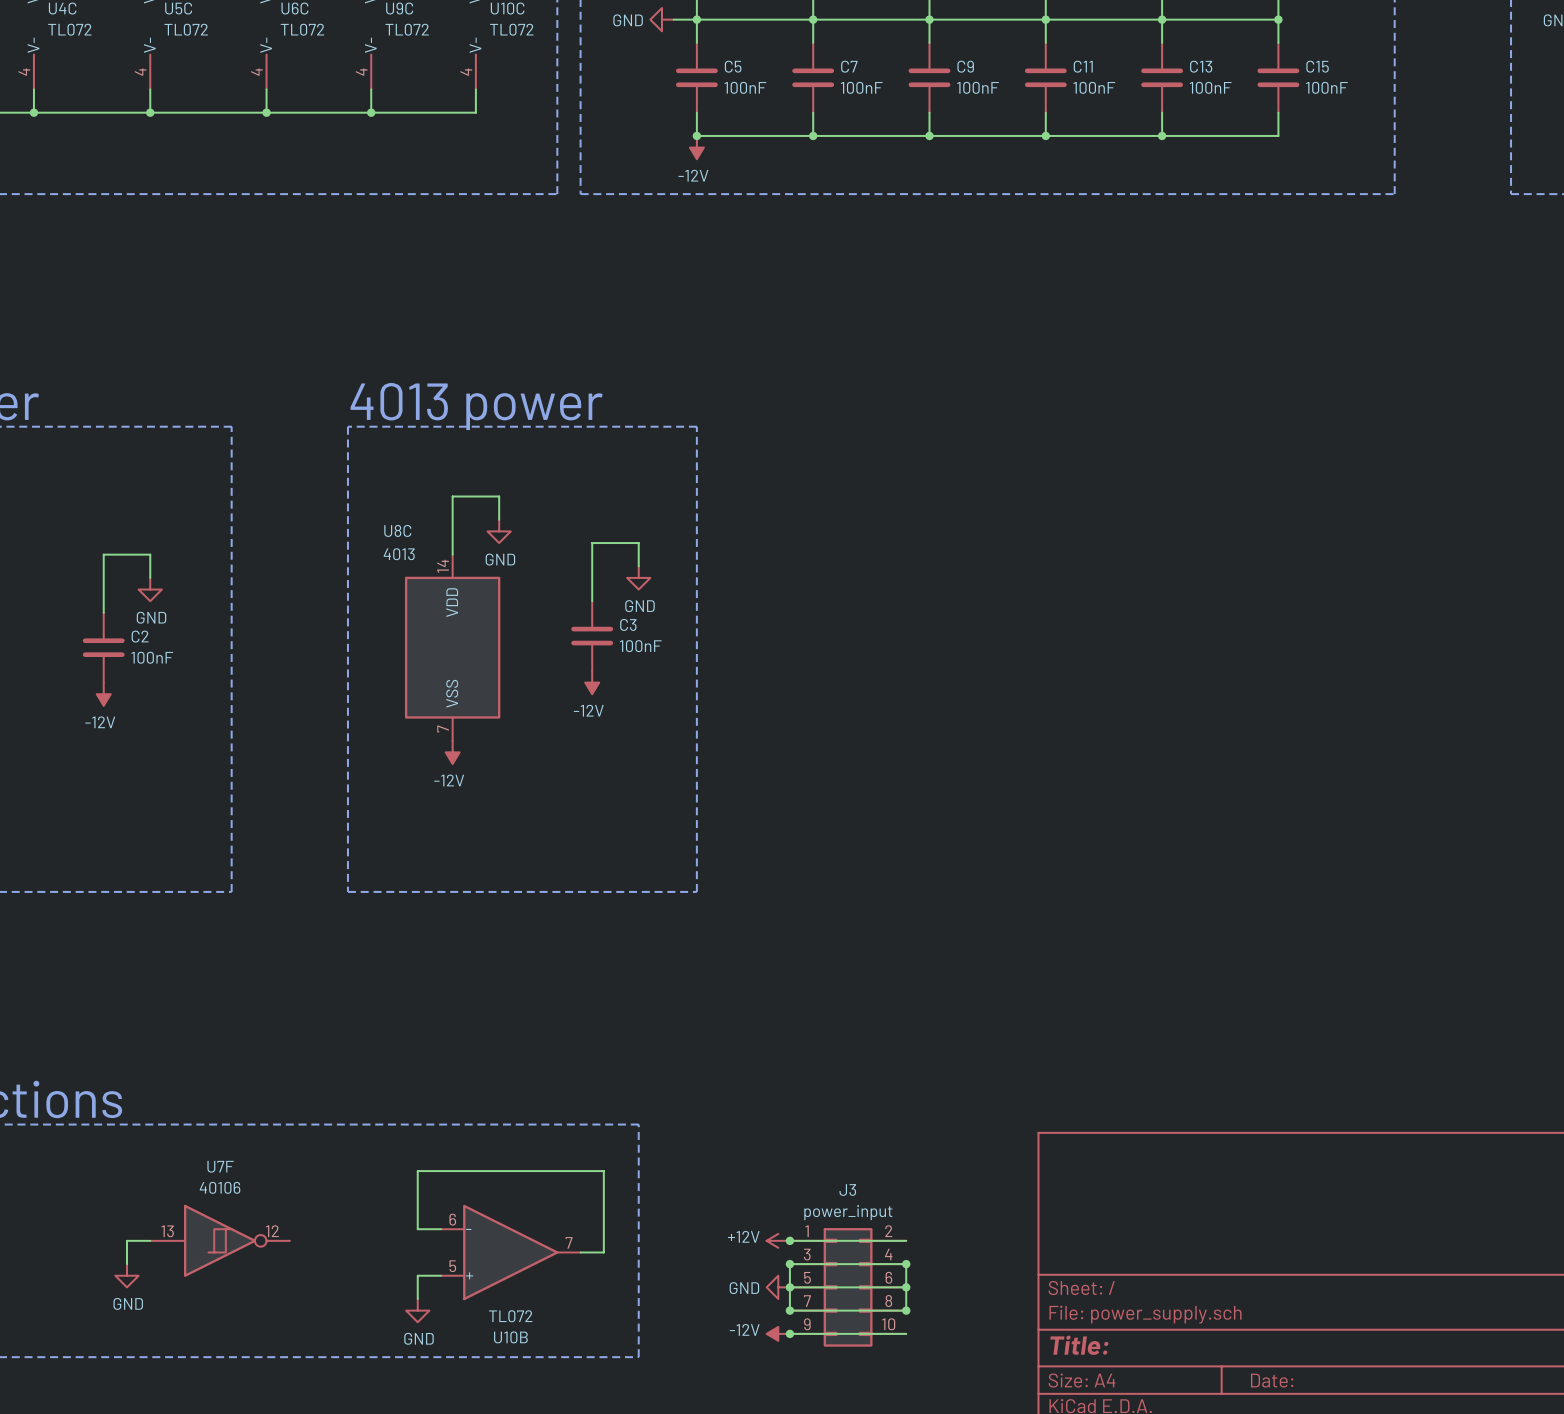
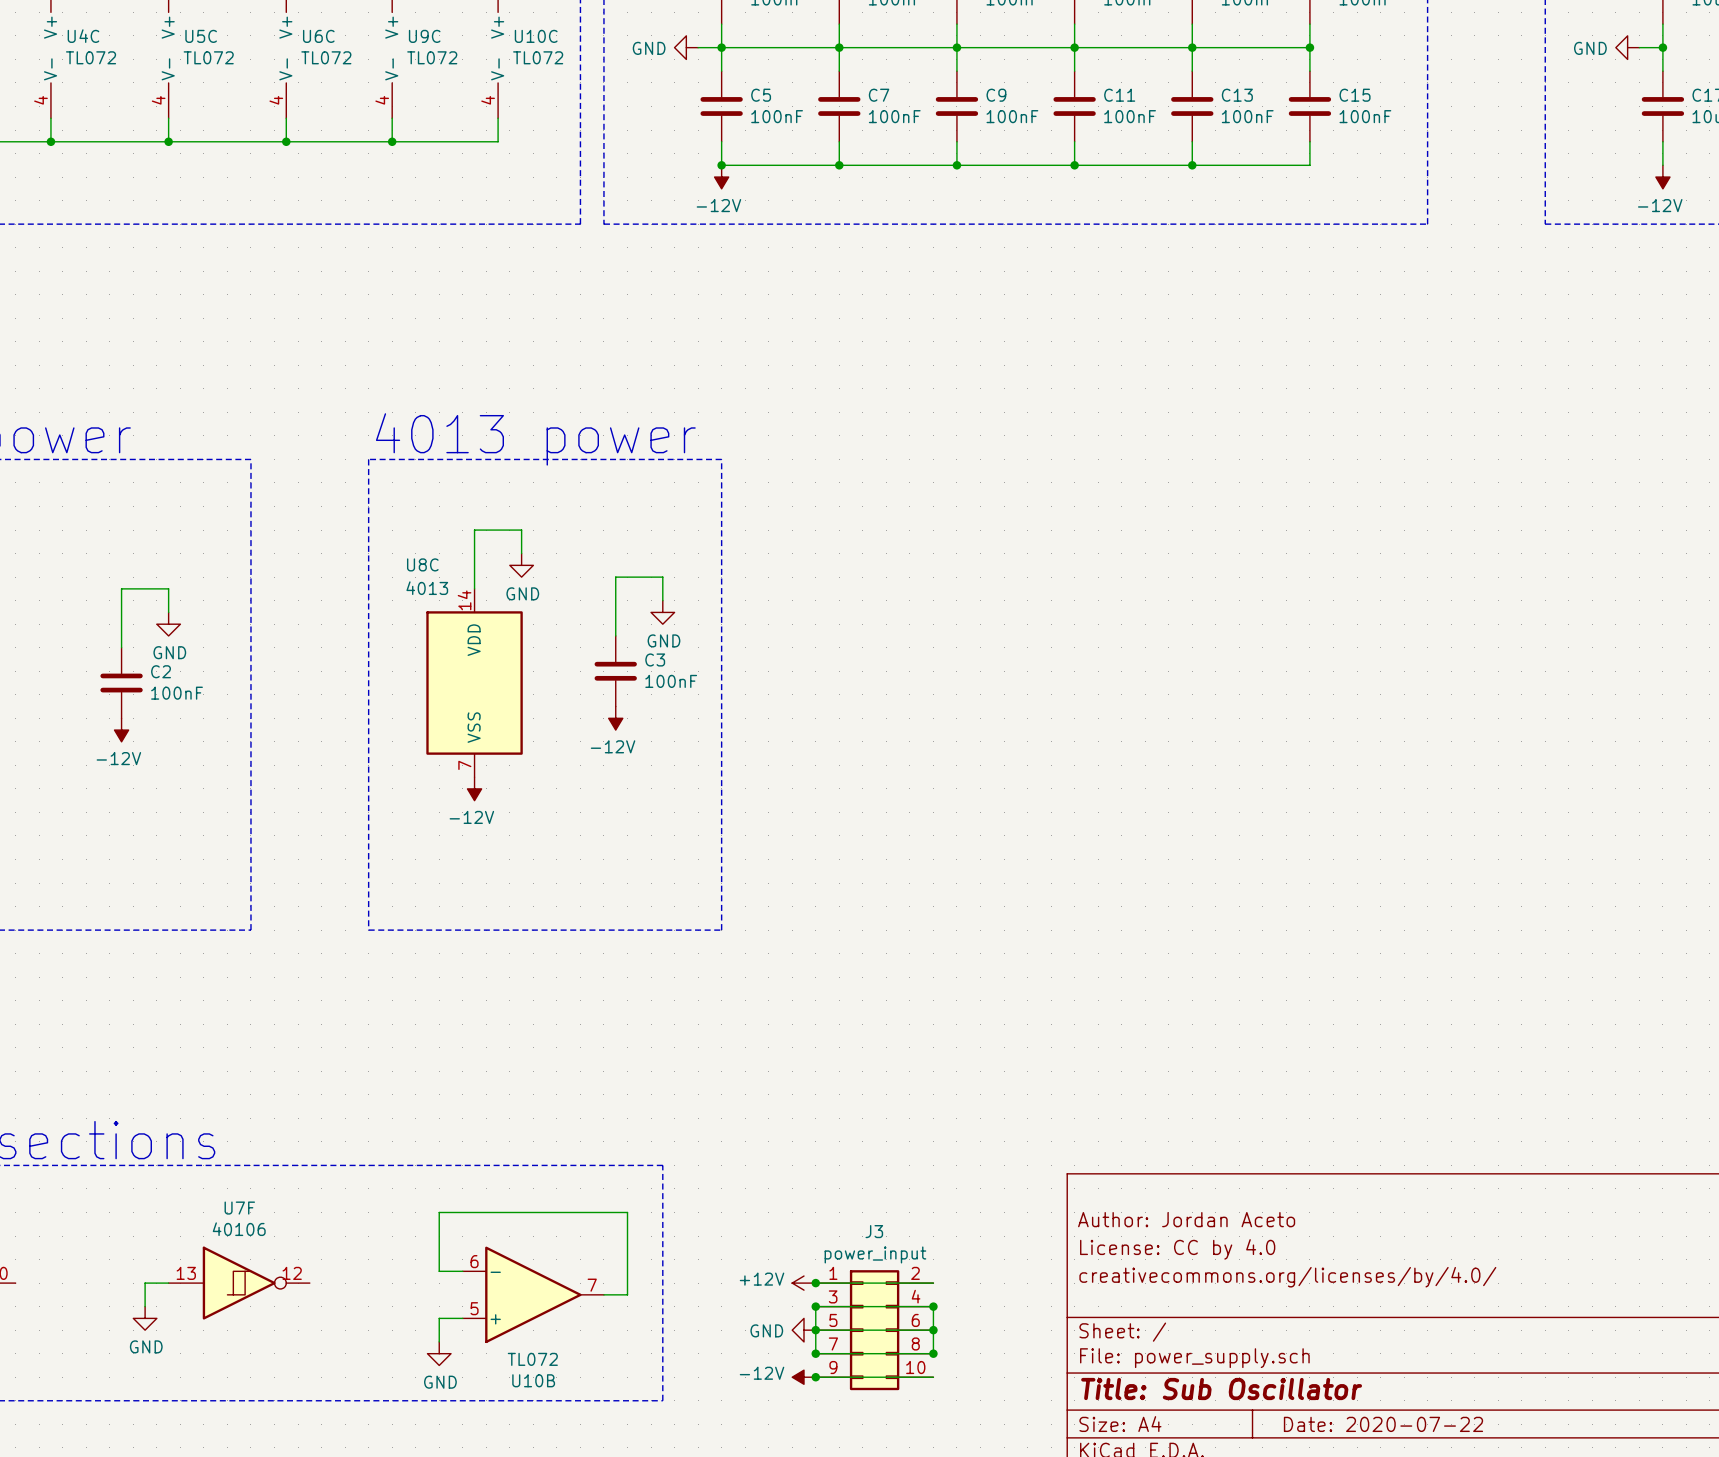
title block: none -> Author: Jordan Aceto (1186, 1219)
title block: none -> License: CC by 4.0 (1177, 1249)
title block: none -> creativecommons.org/licenses/by/4.0/ (1287, 1277)
title block: Title: (1079, 1345) -> Title: Sub Oscillator (1221, 1389)
title block: Date: (1272, 1380) -> Date: 2020-07-22 (1383, 1424)

